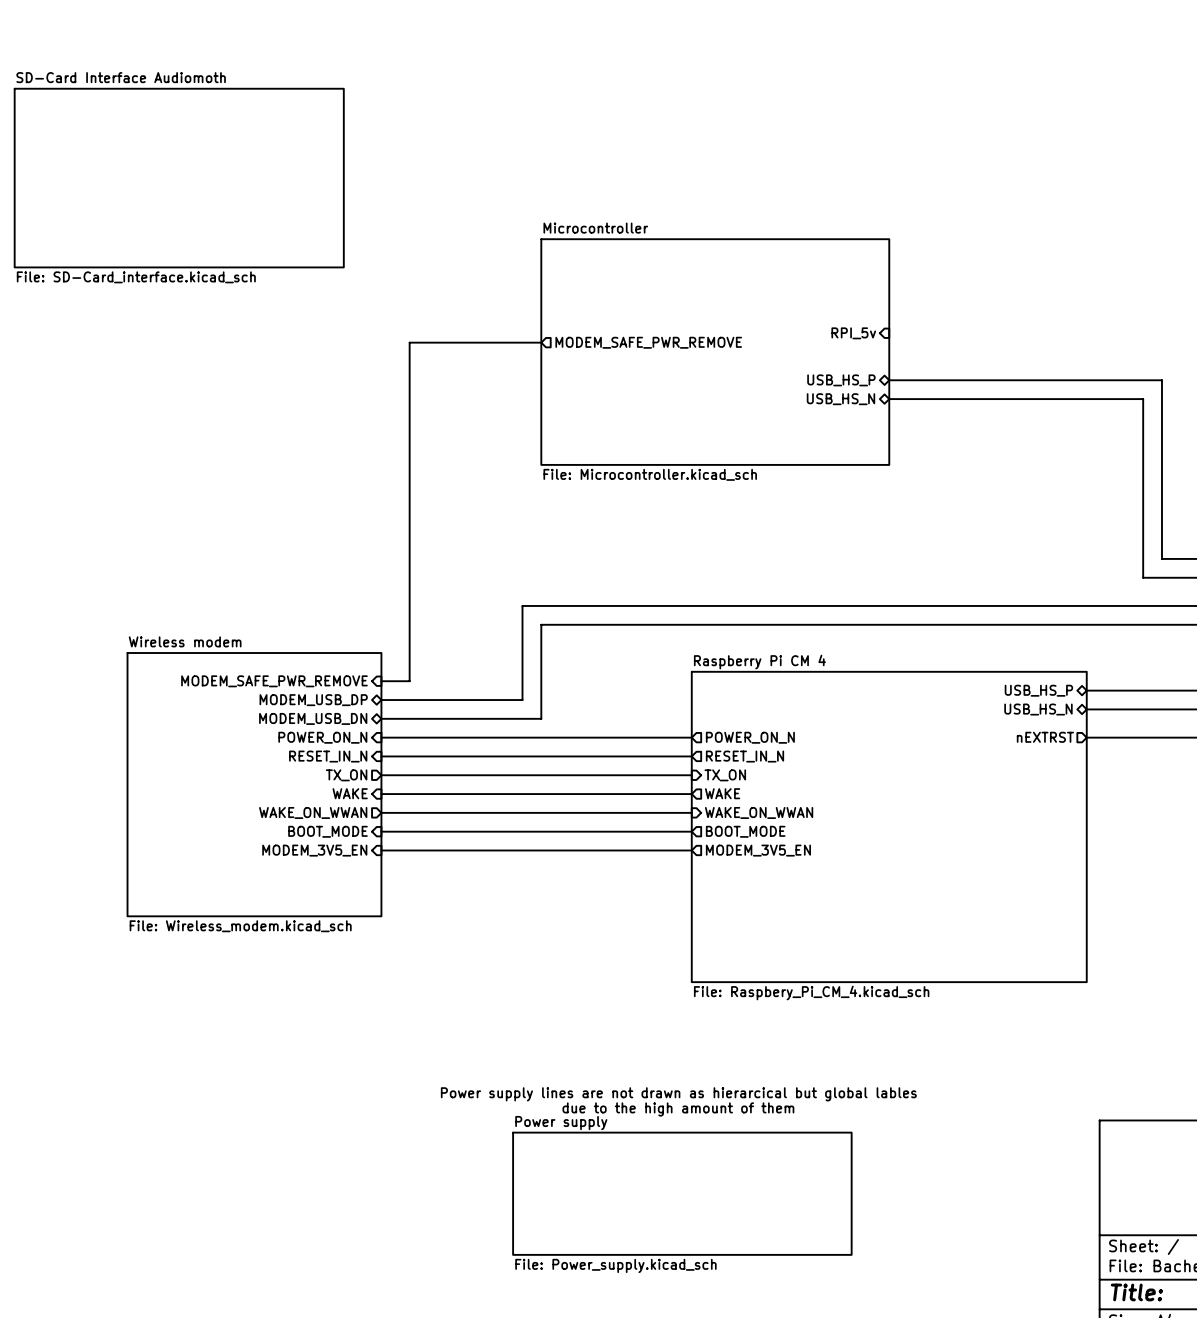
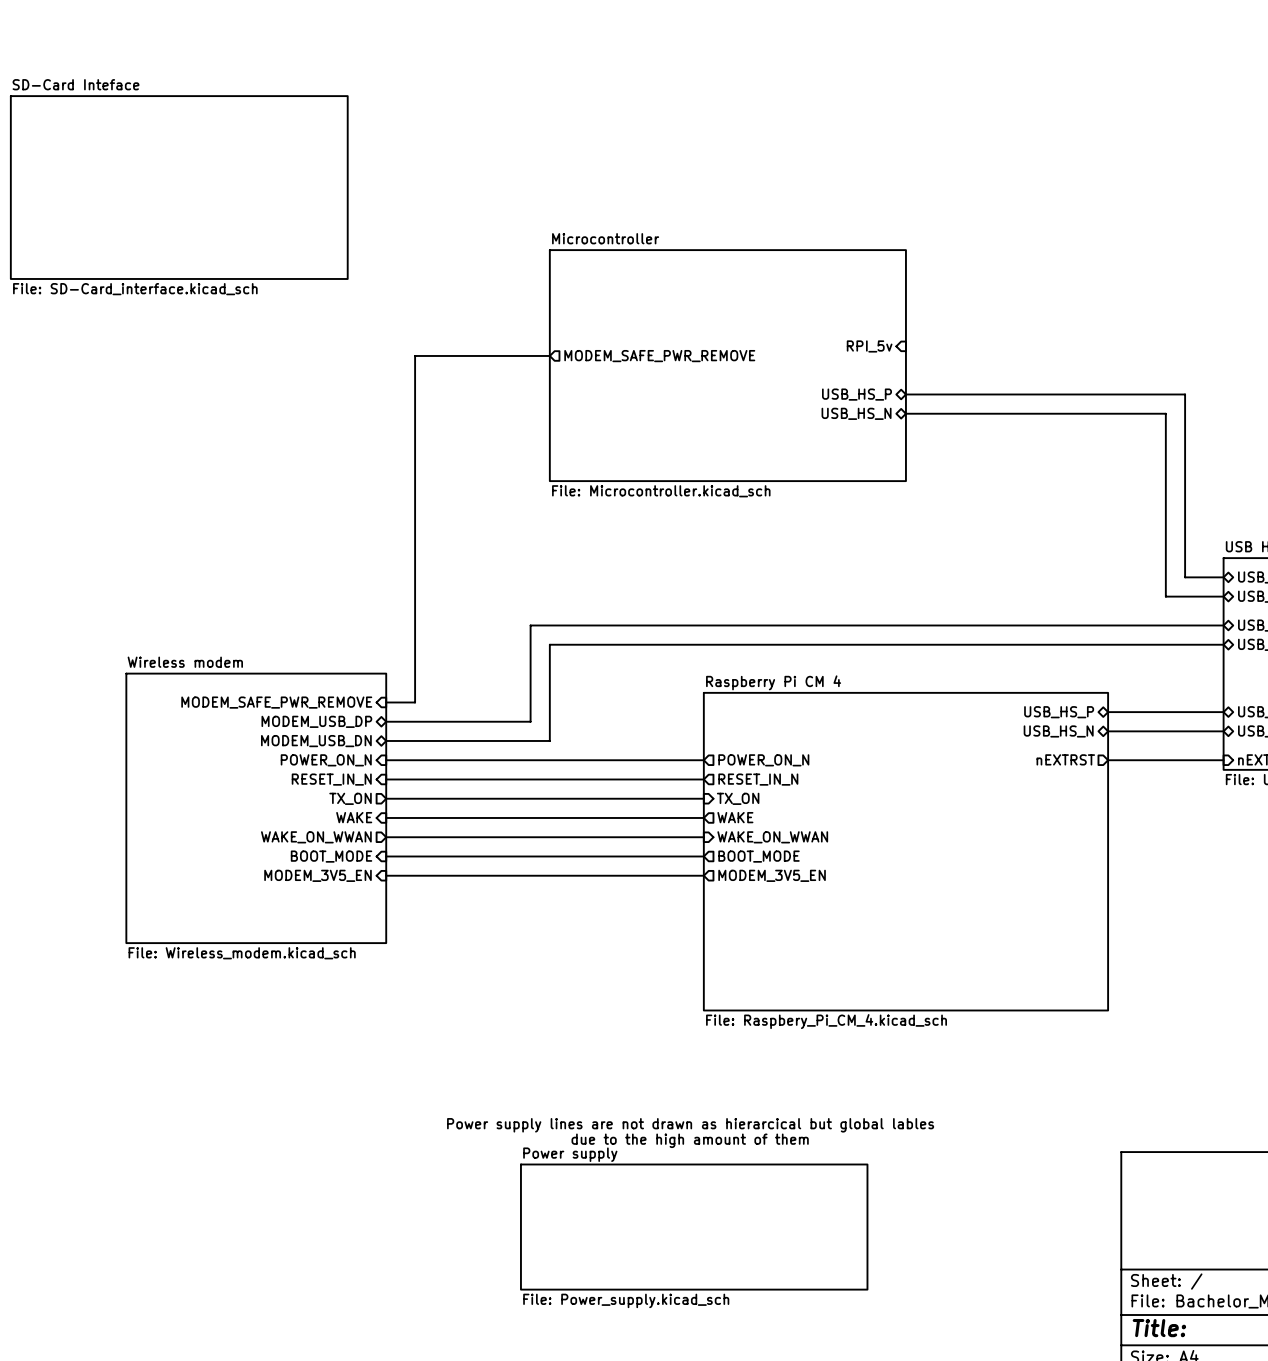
sheet SD-Card Interface Audiomoth name: SD-Card Interface Audiomoth (121, 77) -> SD-Card Inteface (76, 84)

